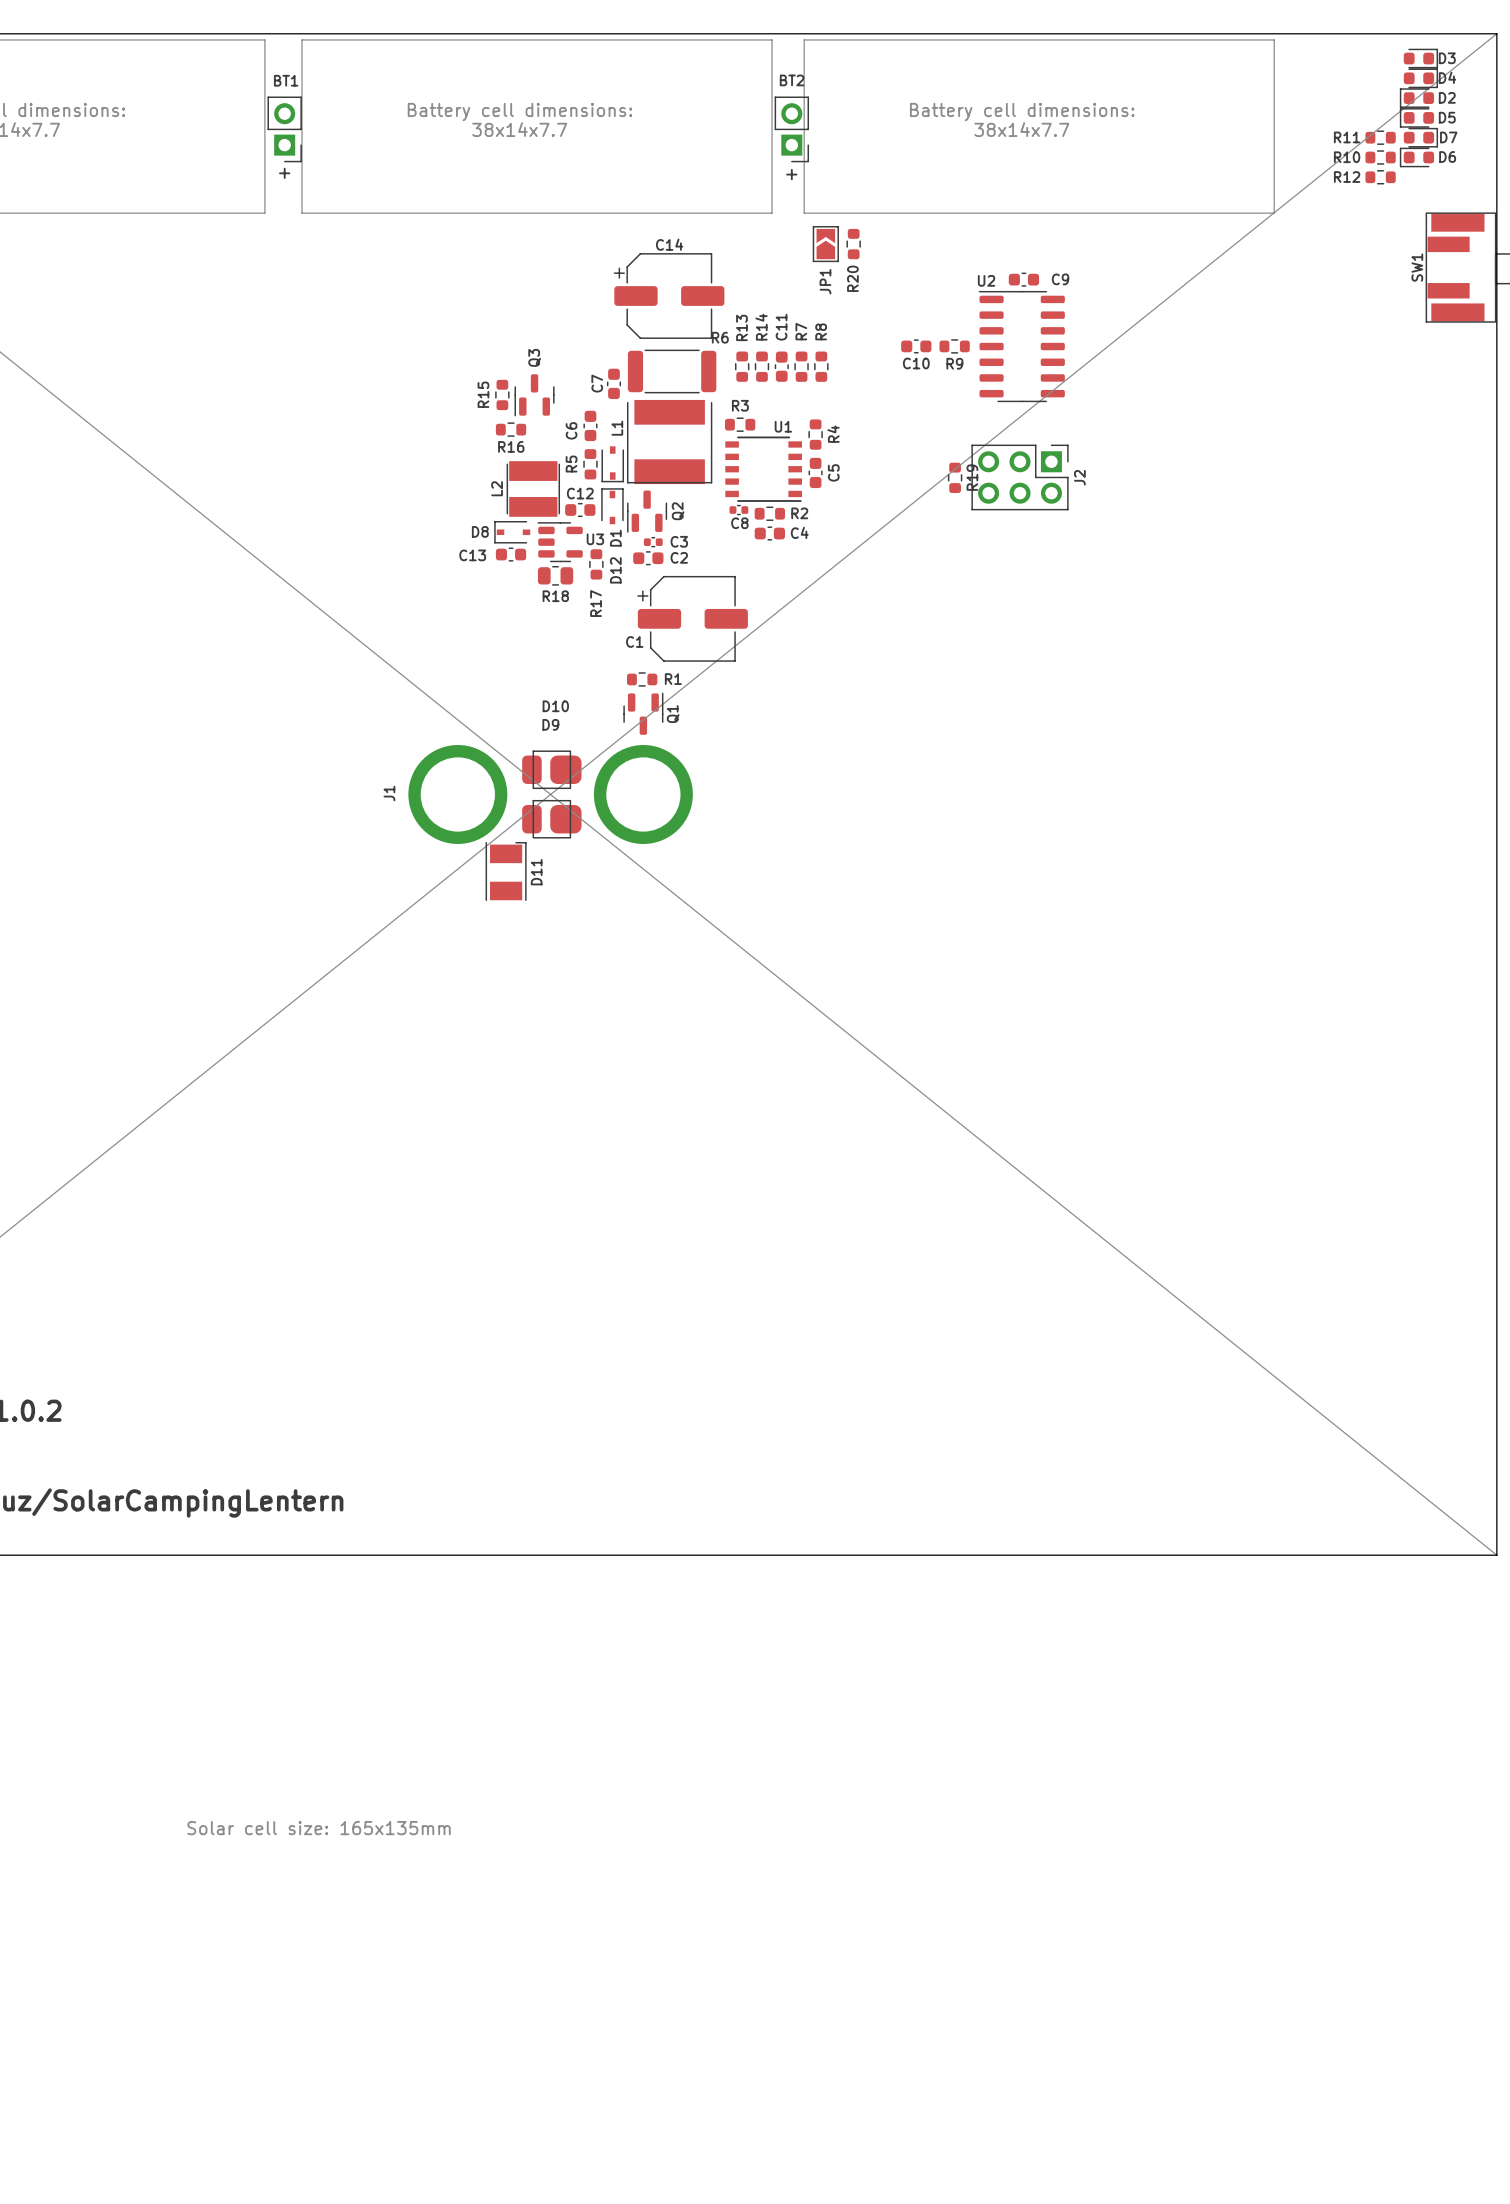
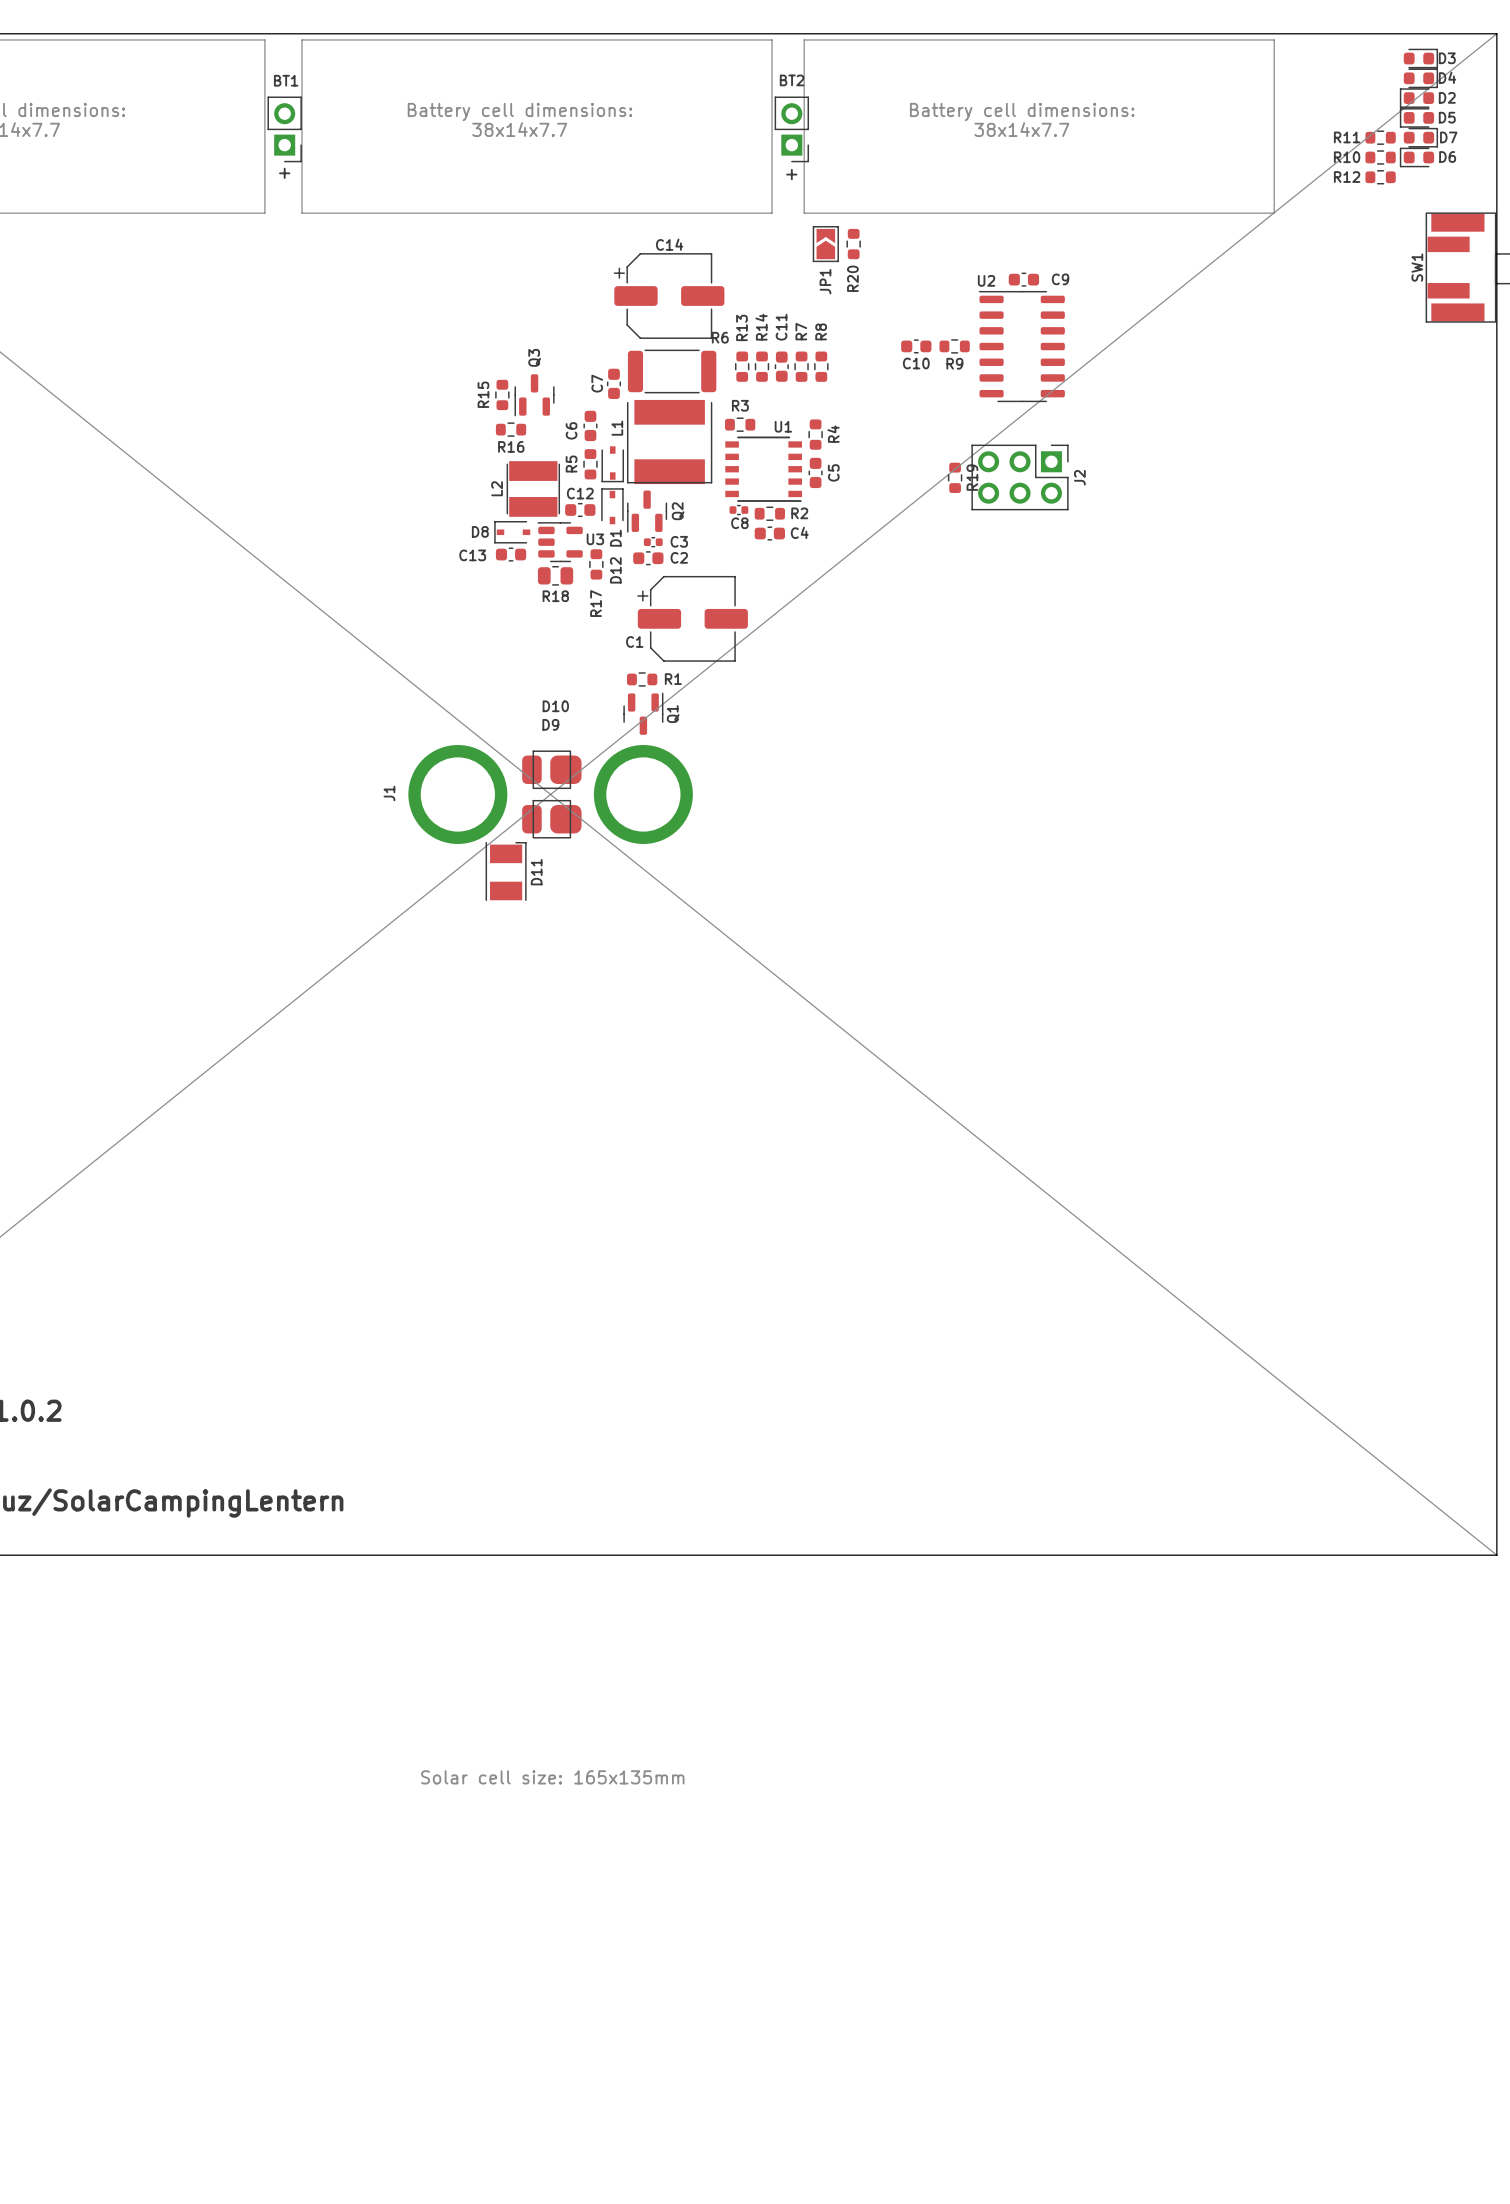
text position: Solar cell size: 165x135mm (319, 1828) -> Solar cell size: 165x135mm (552, 1777)

